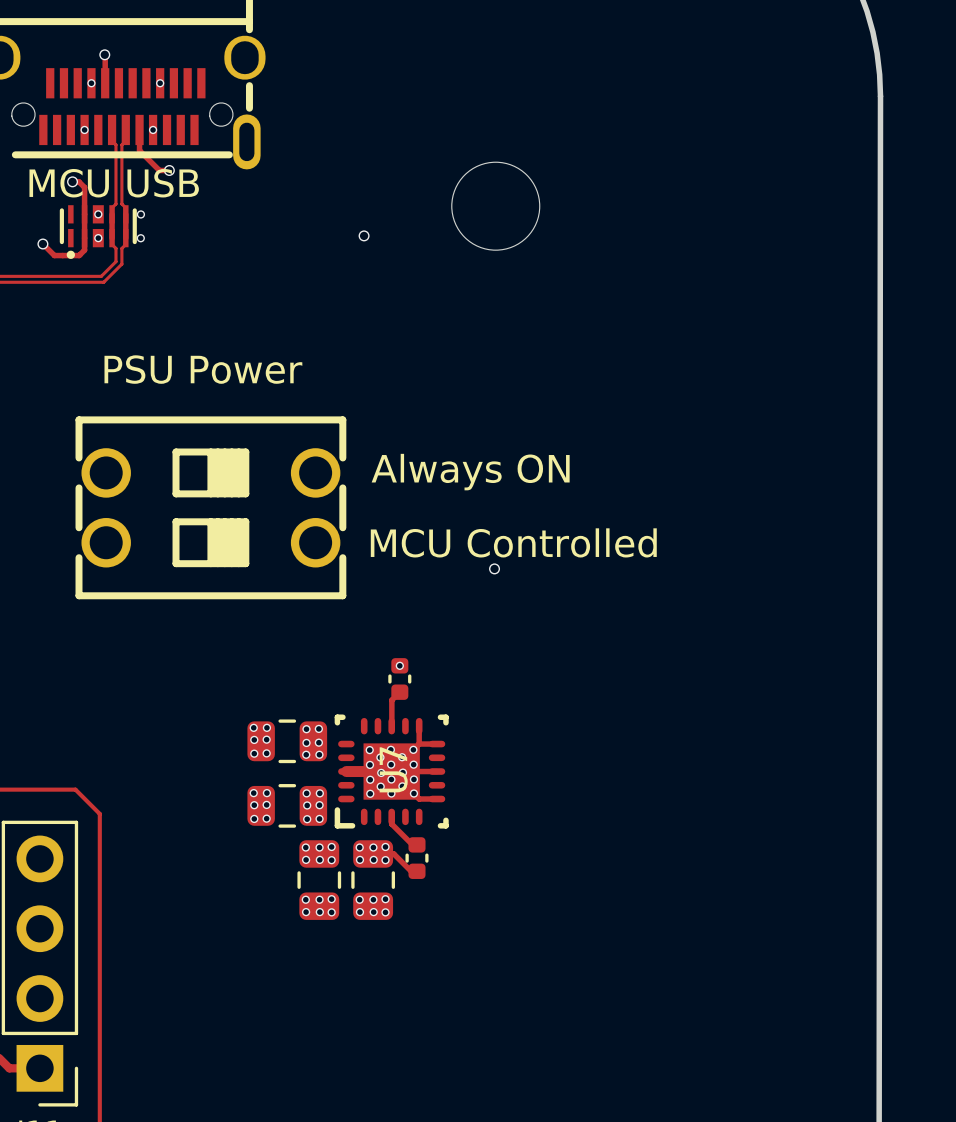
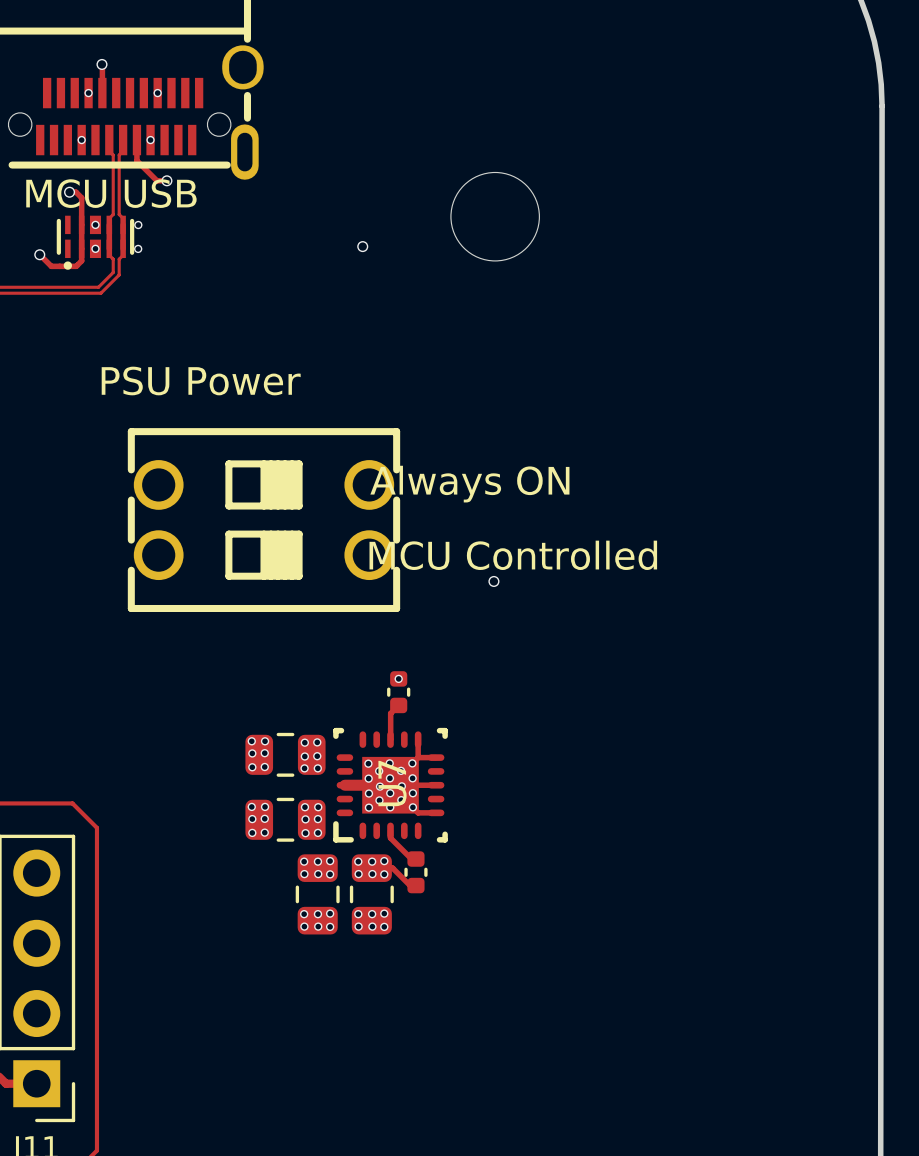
part position: (210, 507) -> (263, 520)

